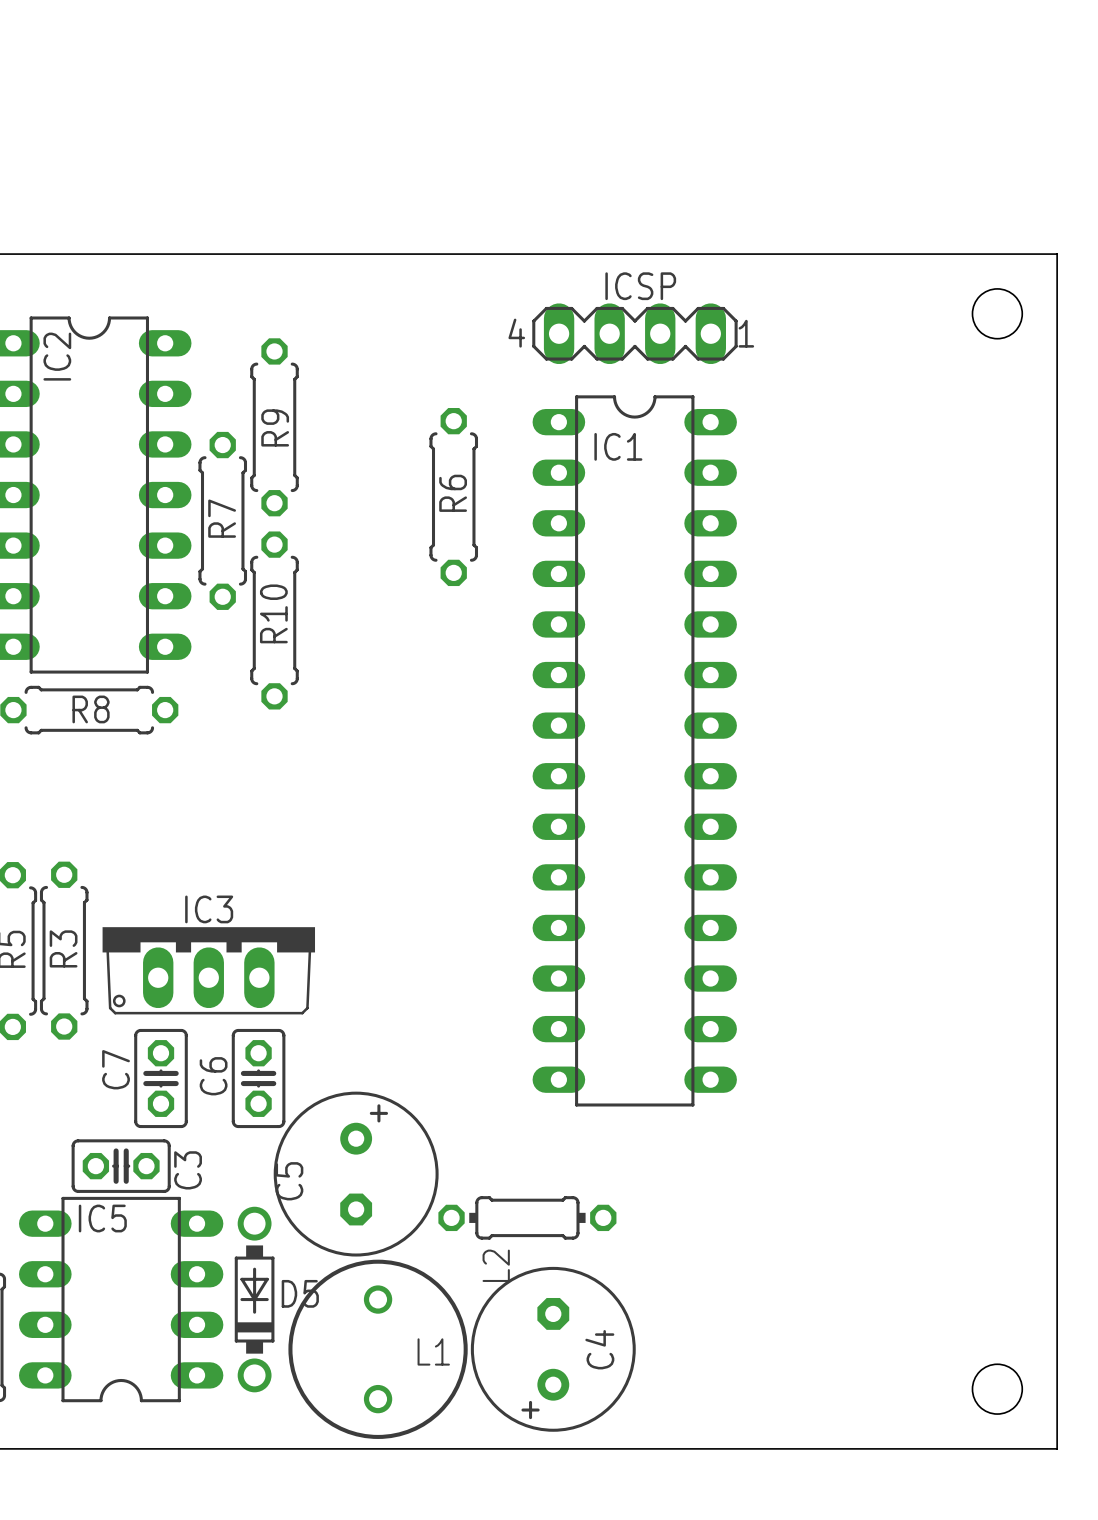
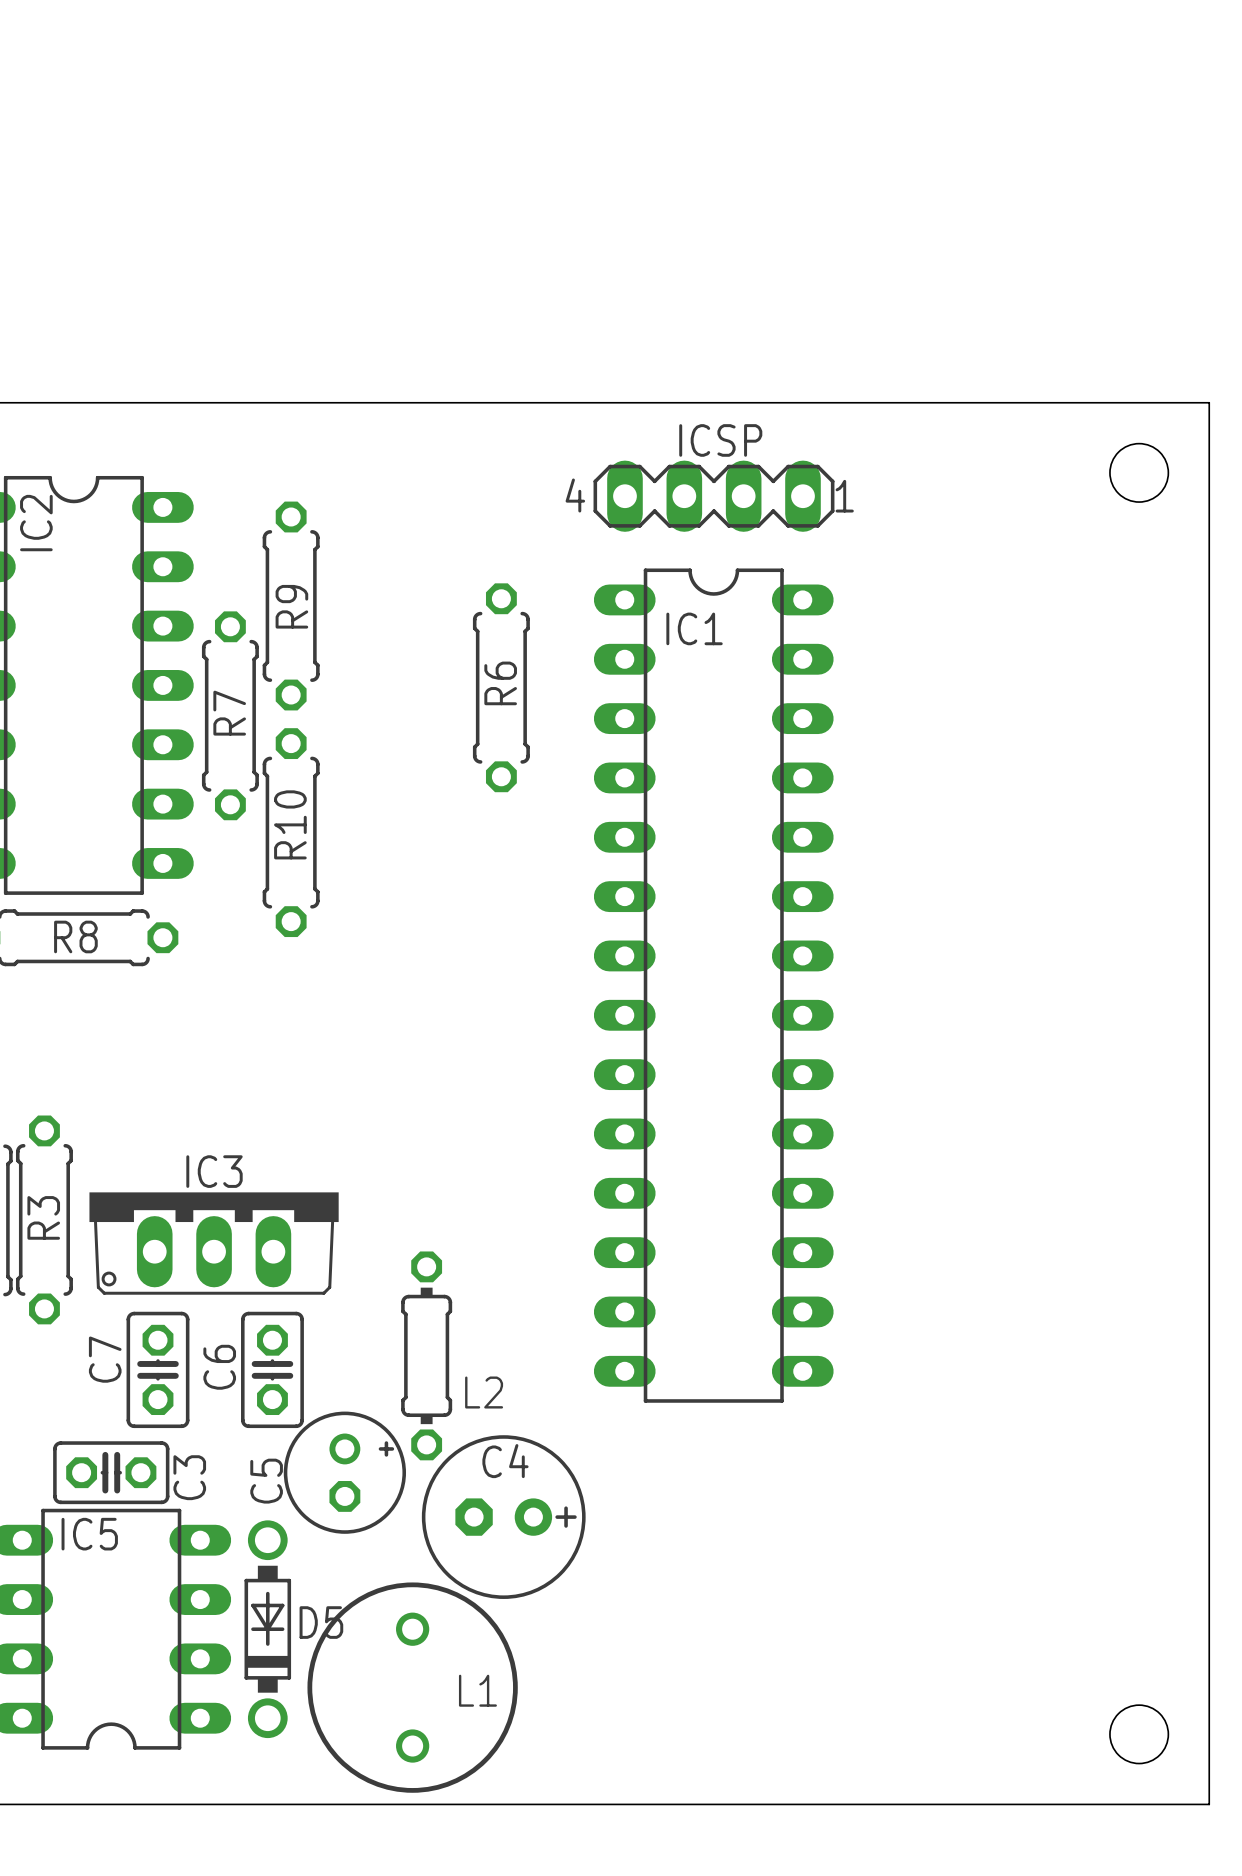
C5 footprint: [273, 1091, 439, 1257] -> [283, 1411, 407, 1534]
L2 rotation: 0° (527, 1217) -> 90° clockwise (426, 1355)
L2 position: (527, 1217) -> (426, 1355)
L2 name position: L2 (496, 1265) -> L2 (484, 1392)
C4 footprint: [470, 1266, 636, 1432] -> [421, 1435, 586, 1599]
C4 name position: C4 (599, 1349) -> C4 (505, 1461)

